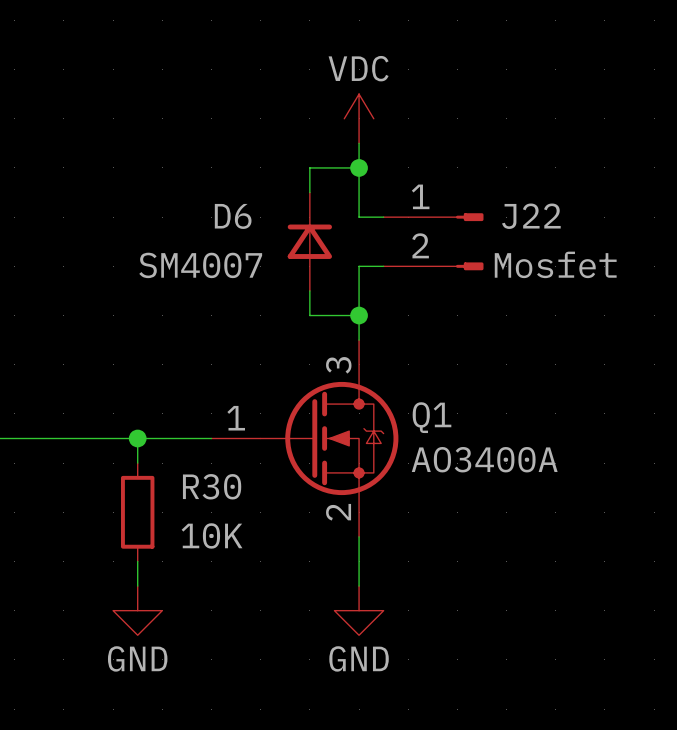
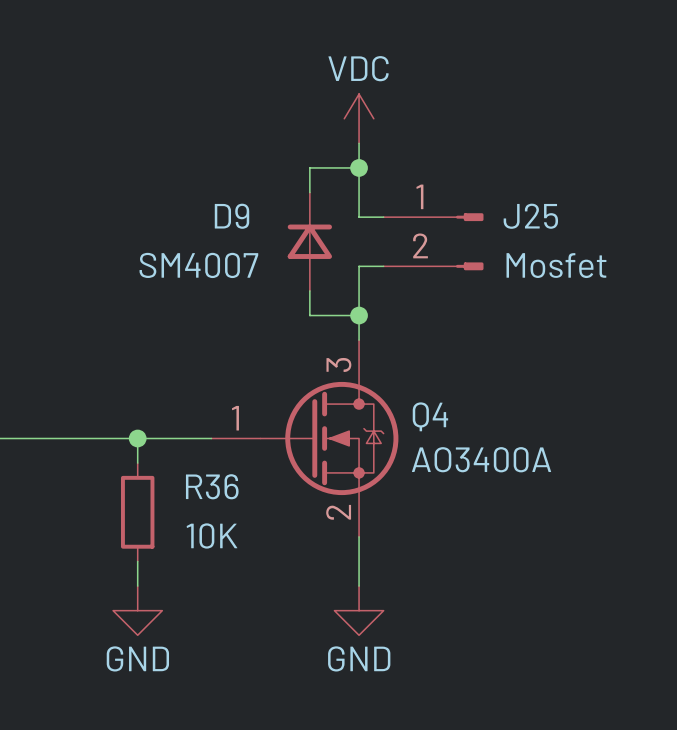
D6 name: D6 (233, 216) -> D9 (232, 216)
J22 name: J22 (531, 216) -> J25 (530, 216)
Q1 name: Q1 (431, 417) -> Q4 (430, 416)
R30 name: R30 (212, 486) -> R36 (212, 486)

